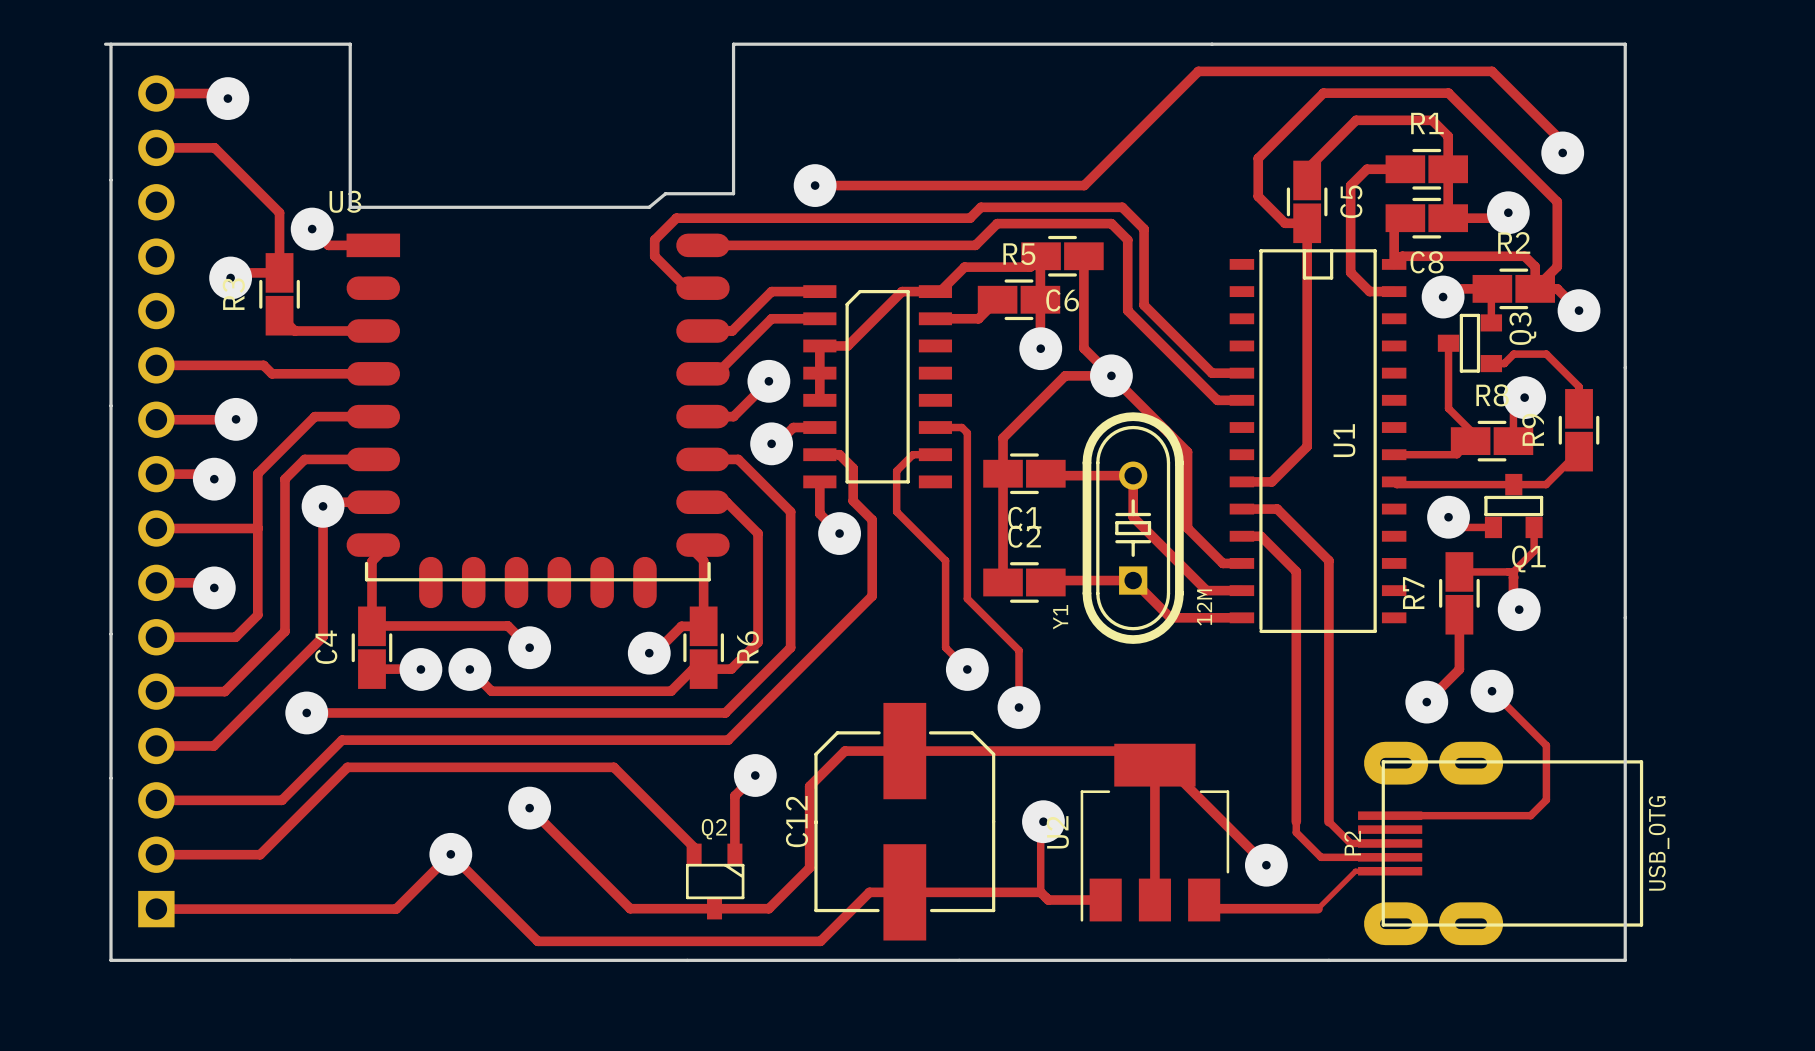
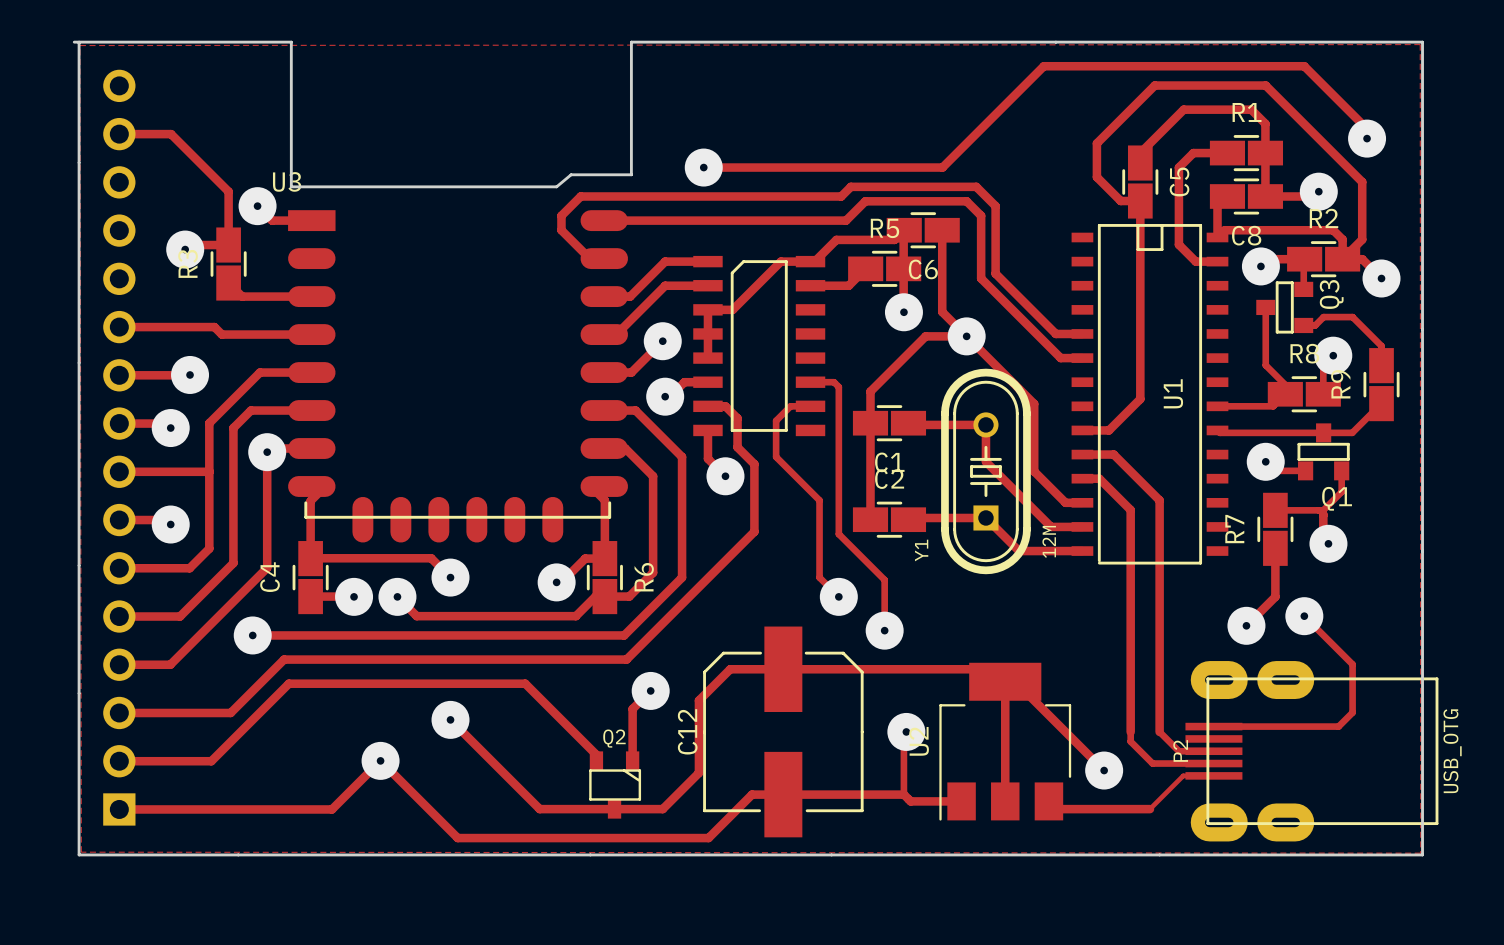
zone outline: none -> (1420, 44) (79, 45) (81, 852) (1420, 853) (1420, 44)
track: (156, 93) (222, 93) (227, 98) -> none
via: (227, 98) -> none

